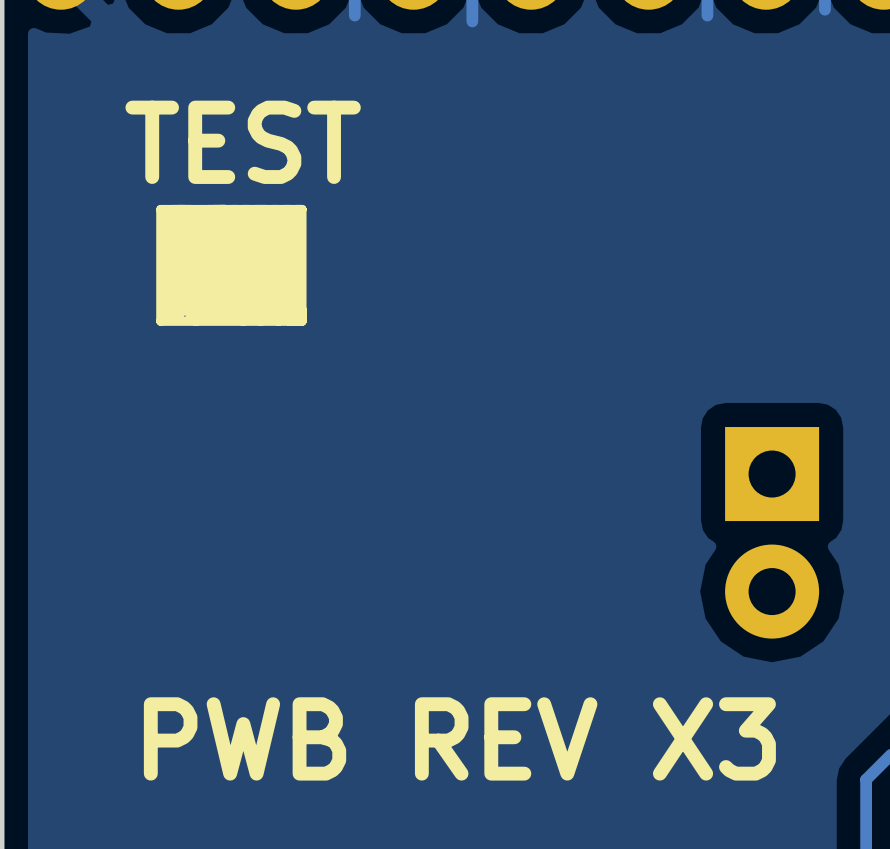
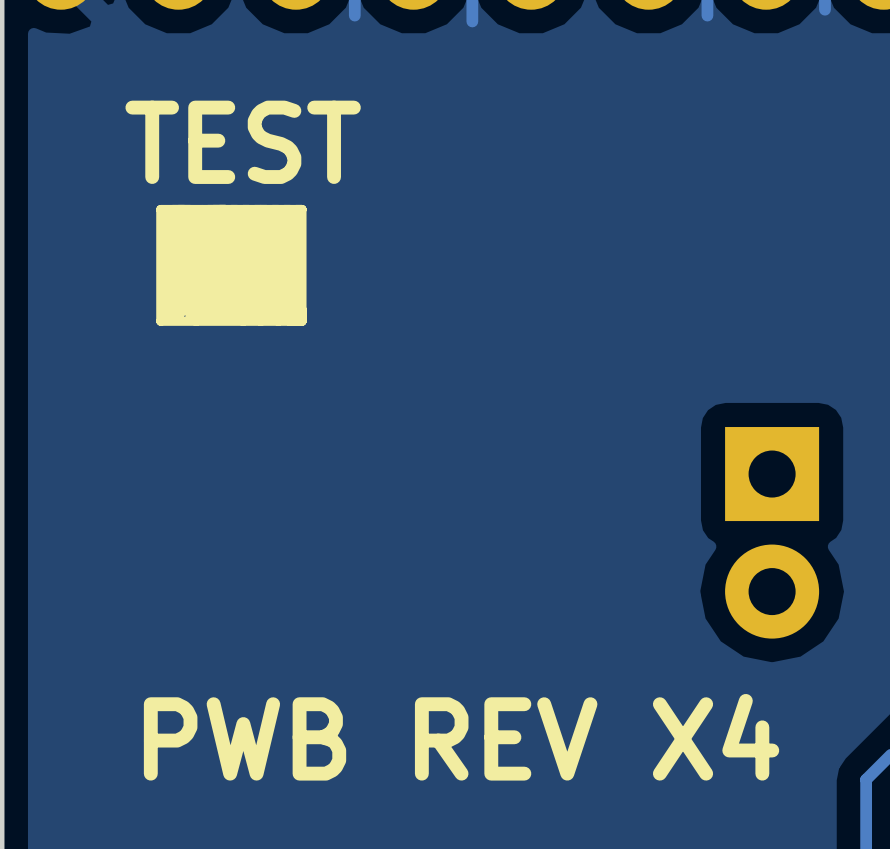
text: PWB REV X3 (459, 738) -> PWB REV X4 (461, 737)

